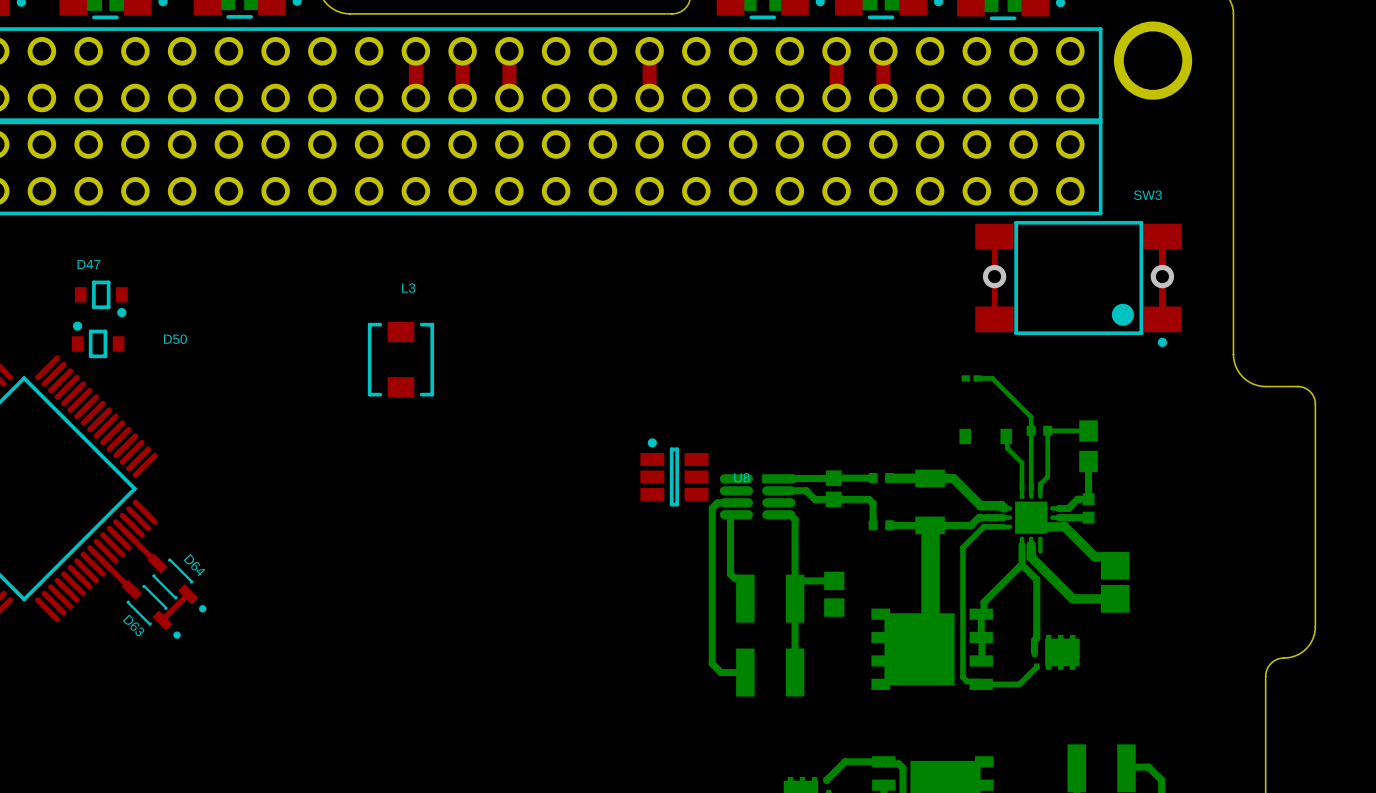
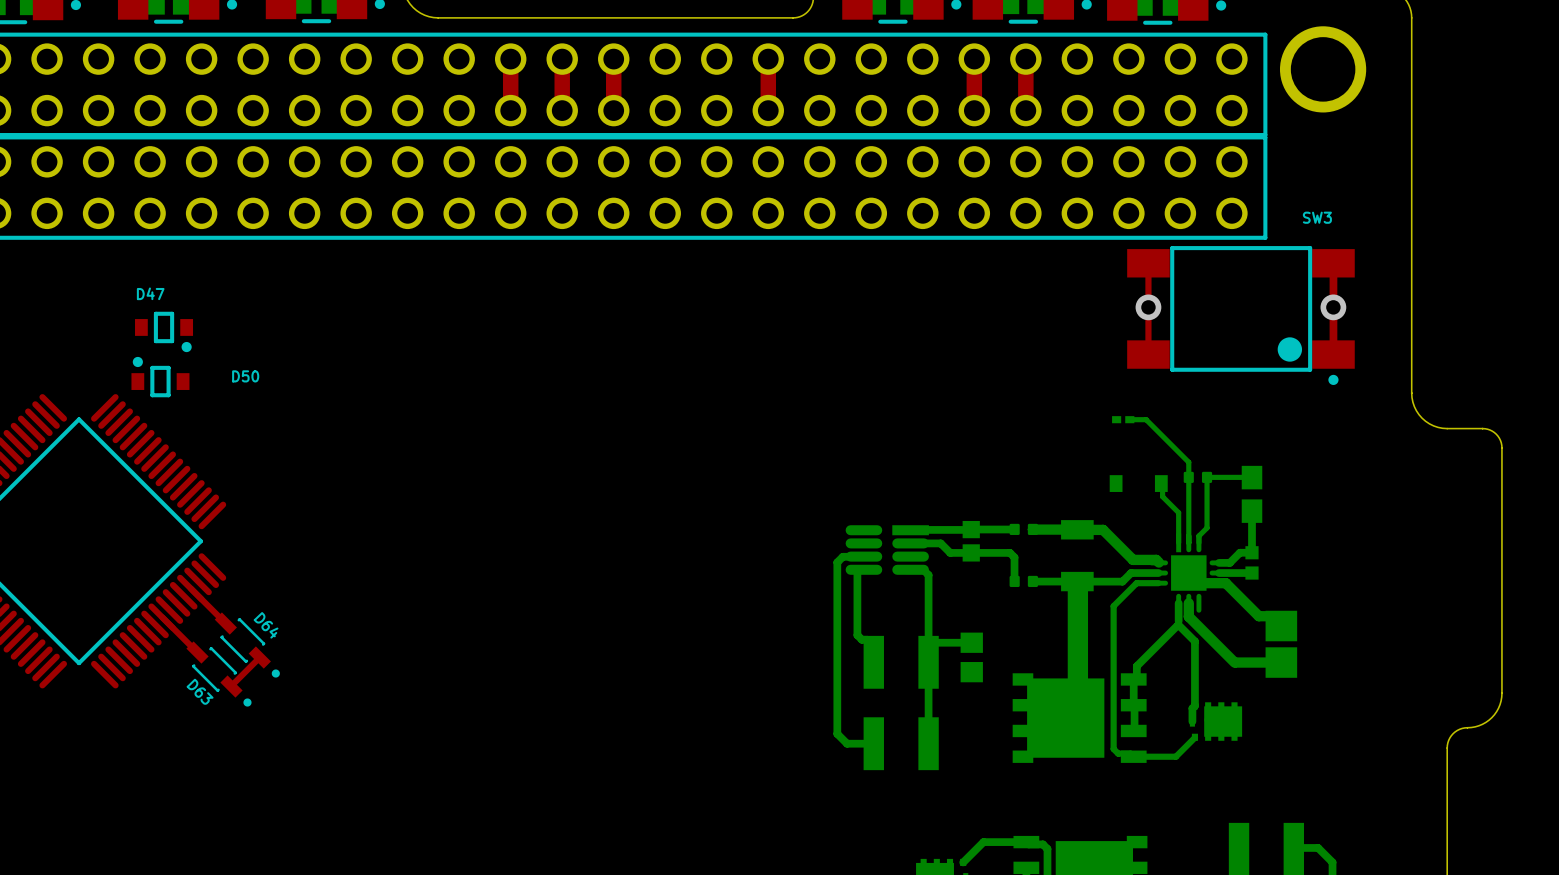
L3: (400, 359) -> none
U8: (674, 472) -> none

